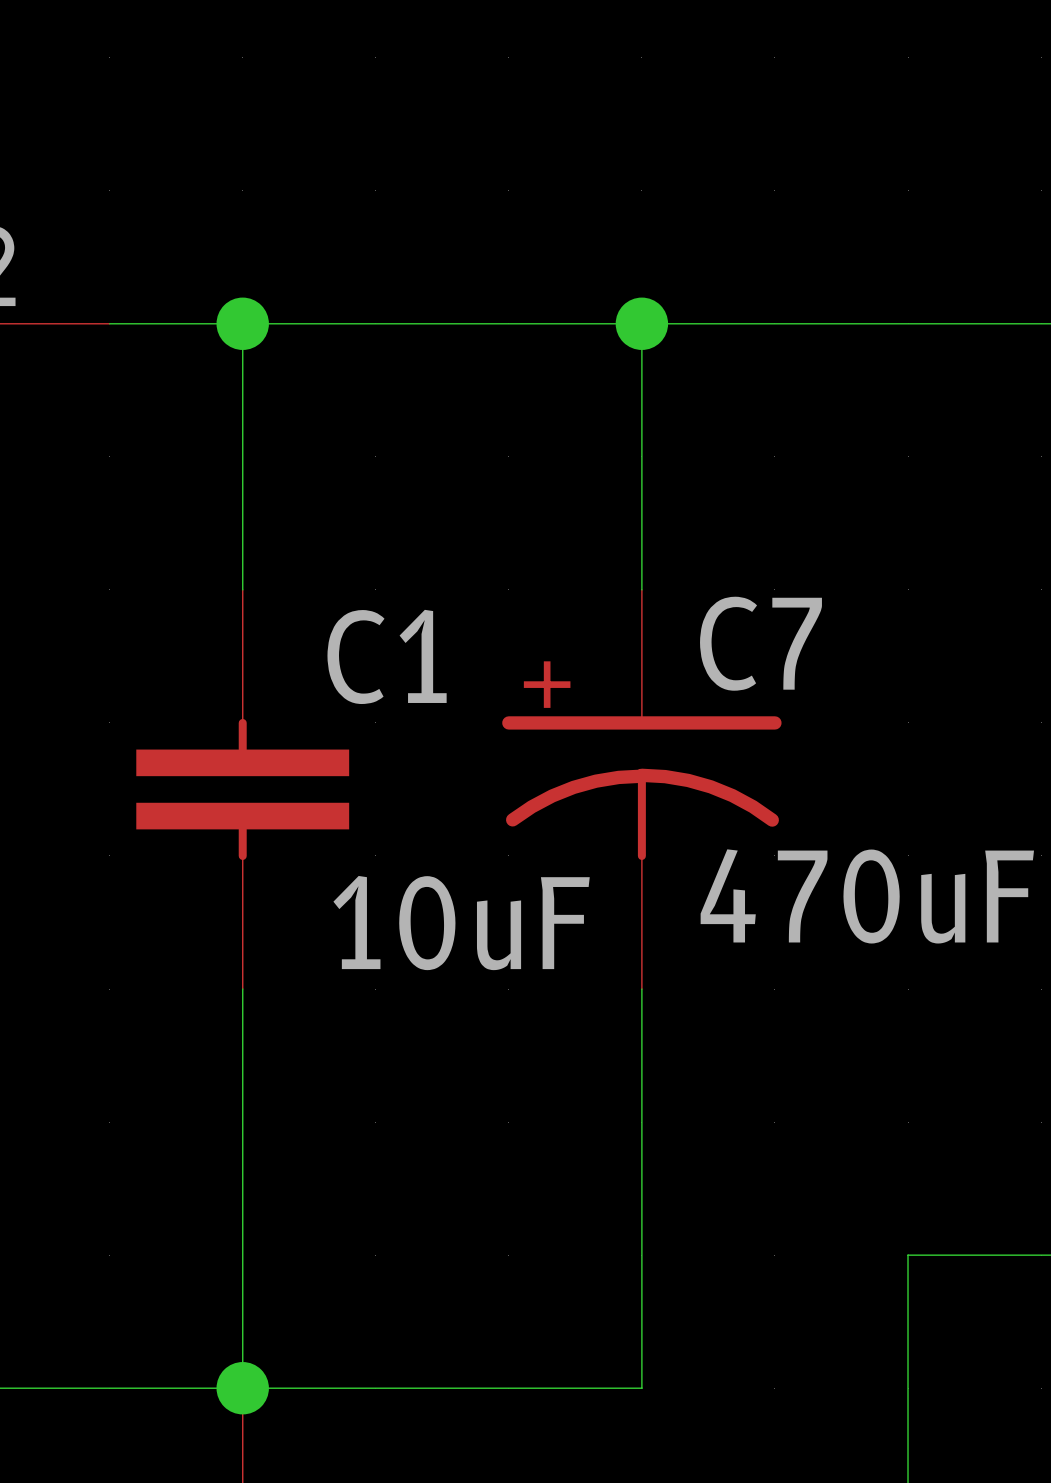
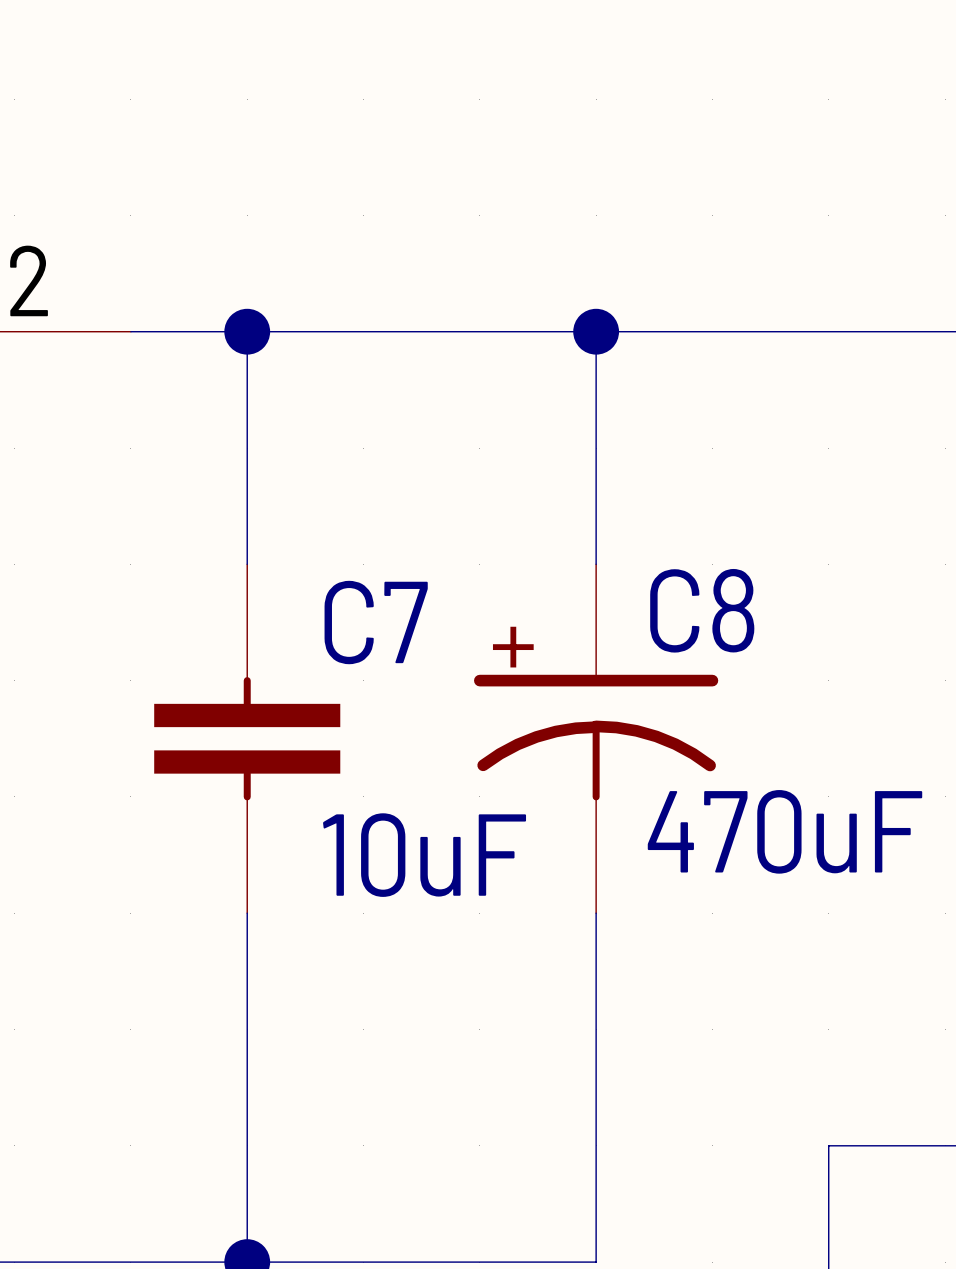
C7 name: C7 (760, 643) -> C8 (702, 610)
C1 name: C1 (387, 656) -> C7 (376, 622)

